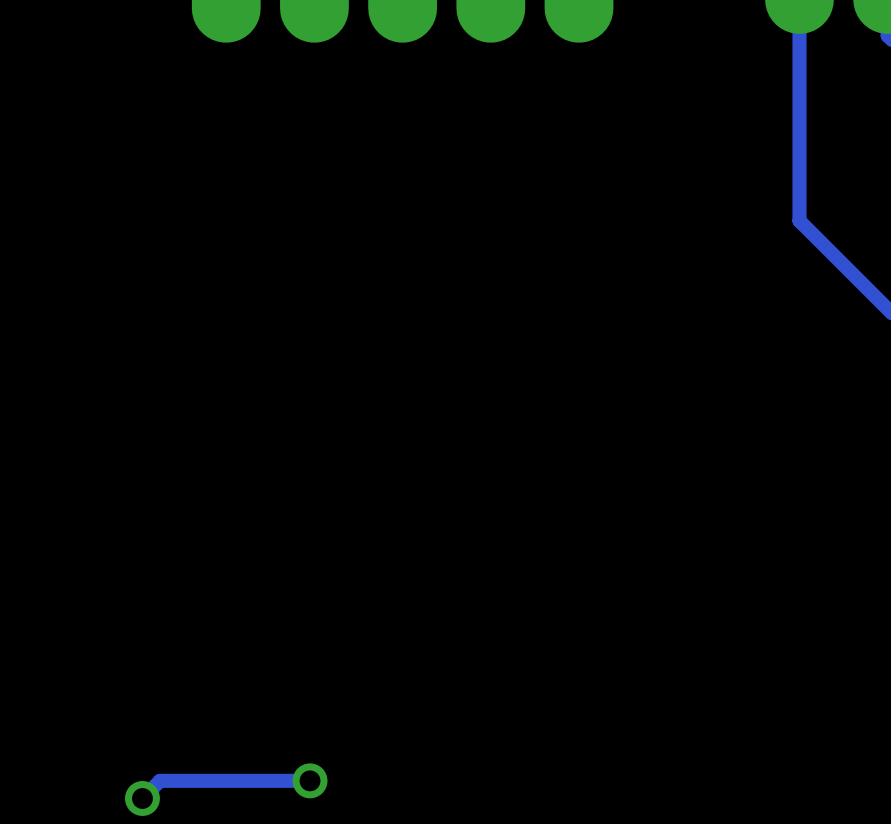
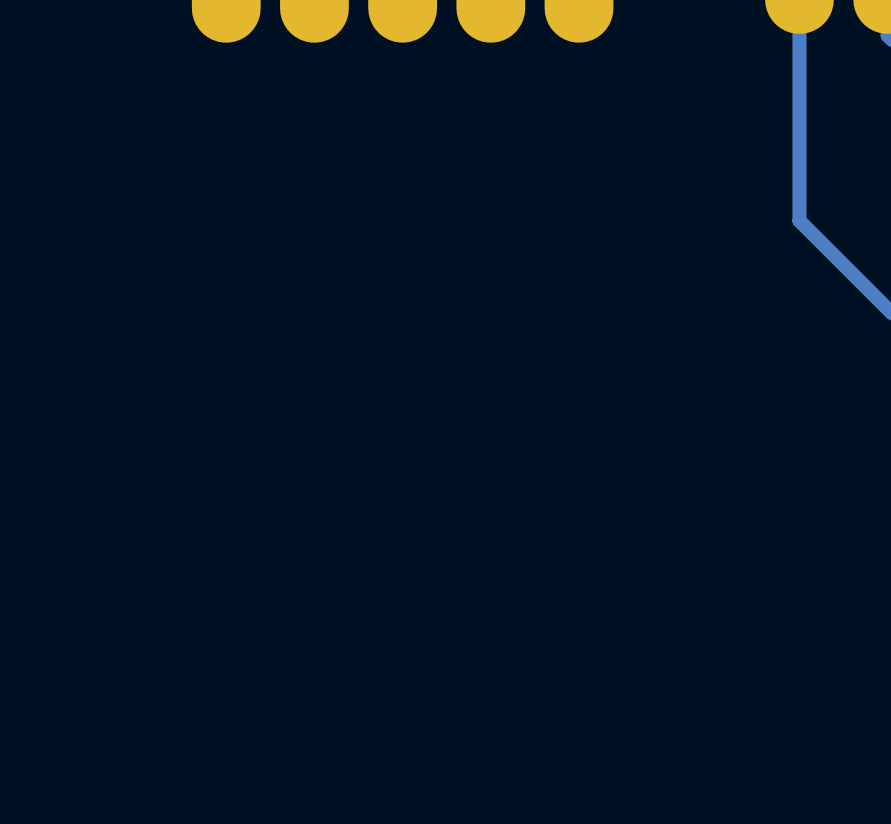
track: (310, 780) (160, 780) (142, 798) -> none
via: (310, 780) -> none
via: (142, 798) -> none

